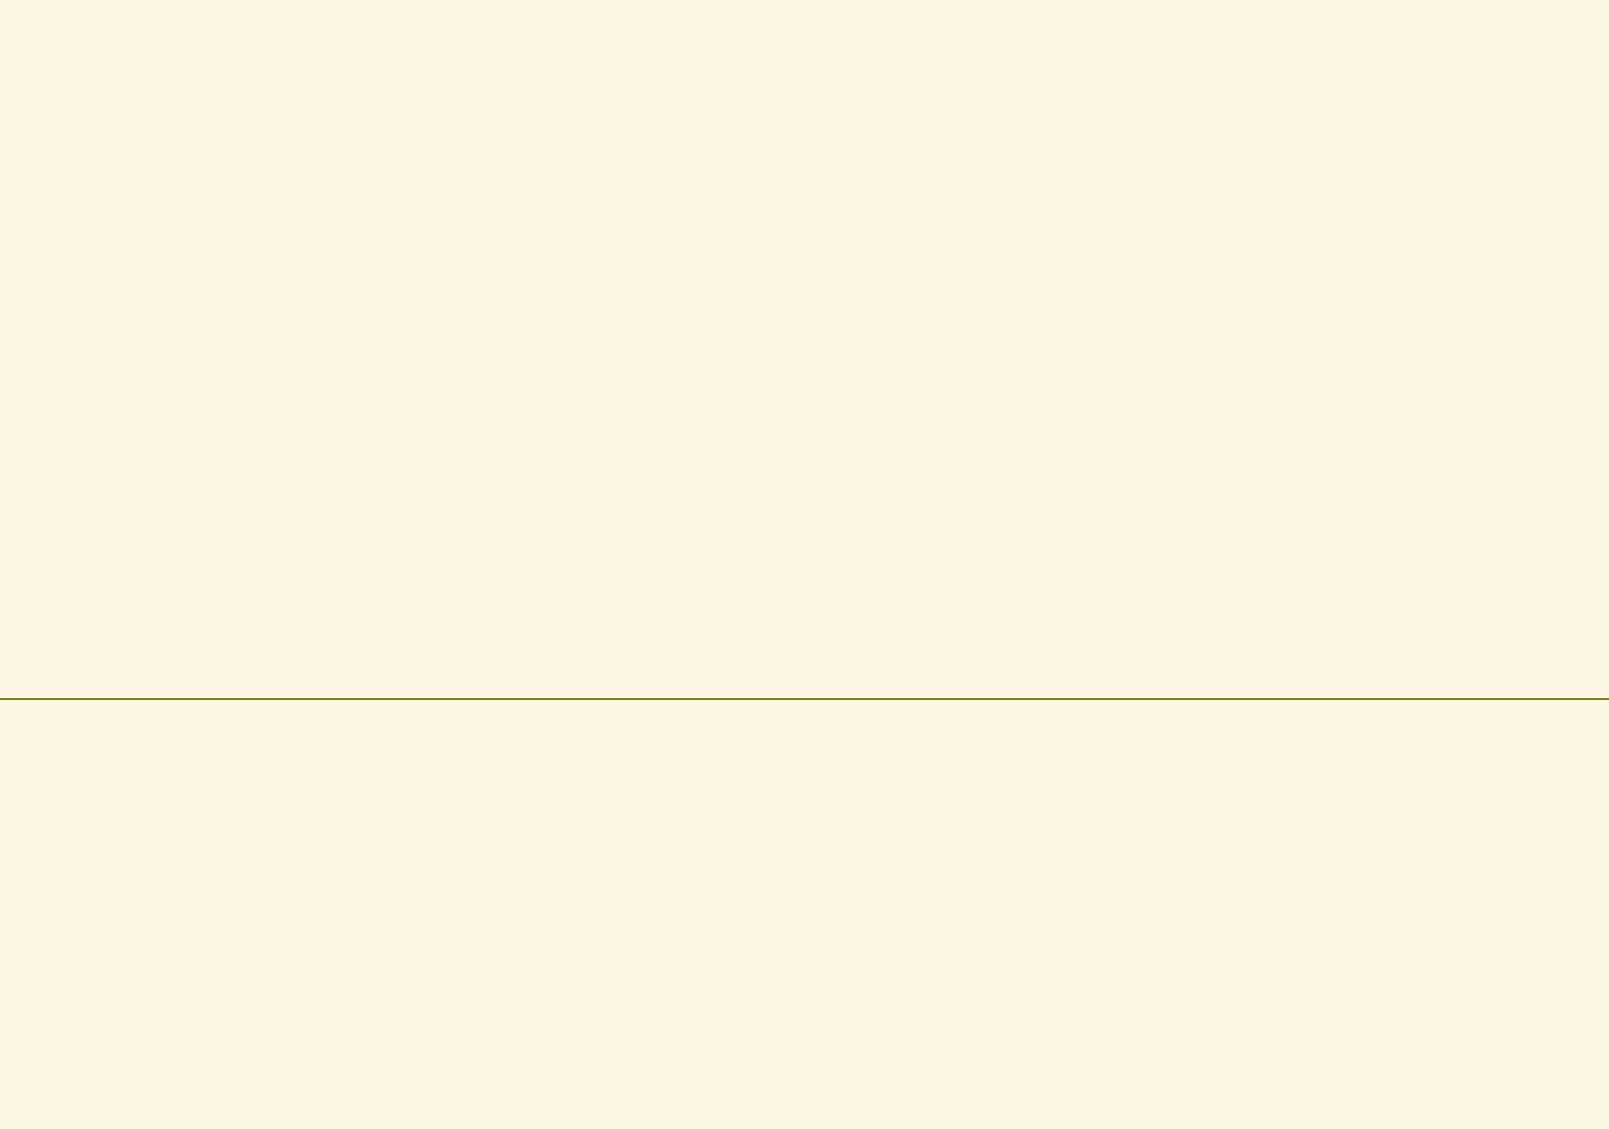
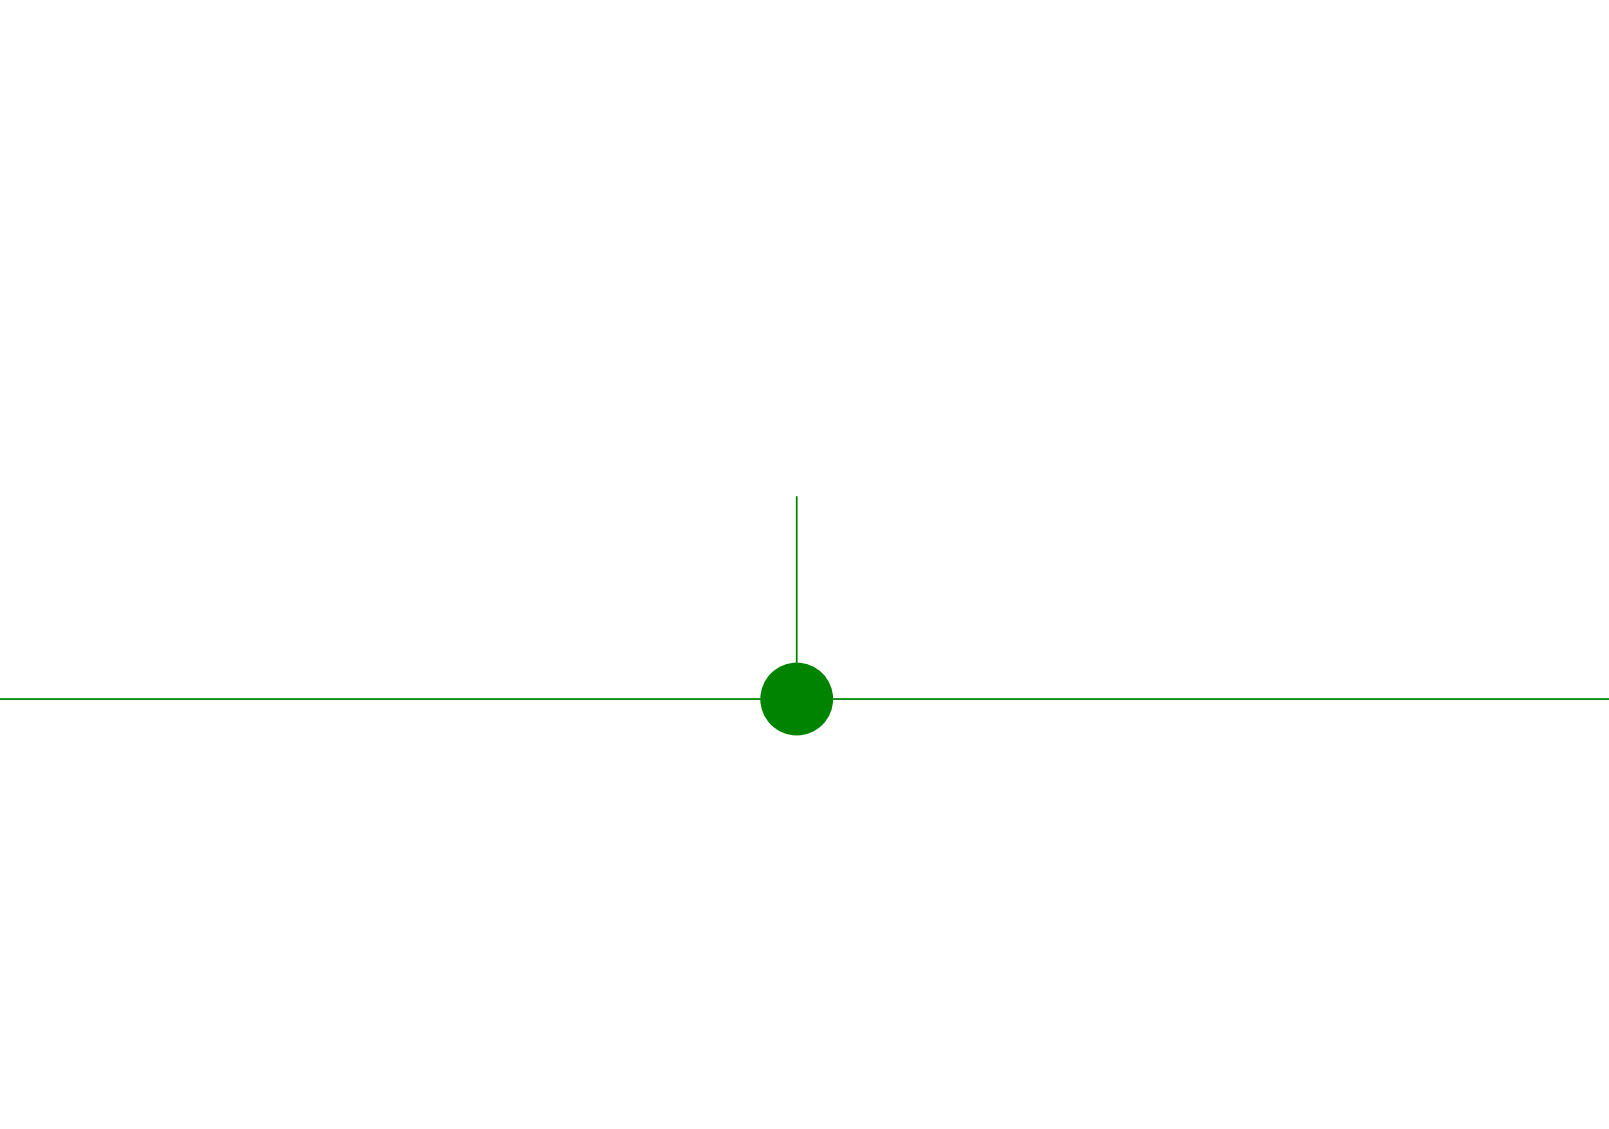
wire: none -> (796, 496) (796, 699)
junction: none -> (796, 699)

